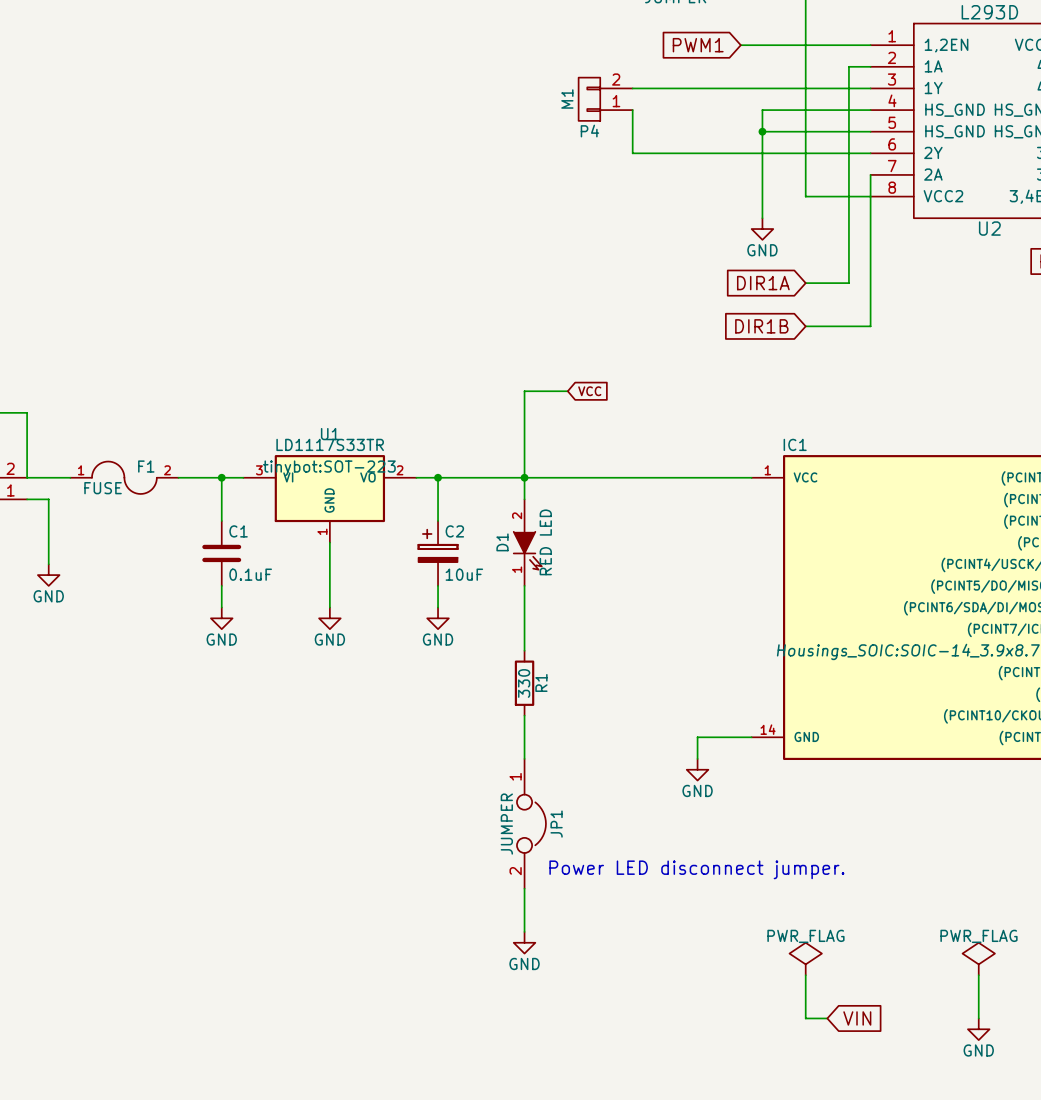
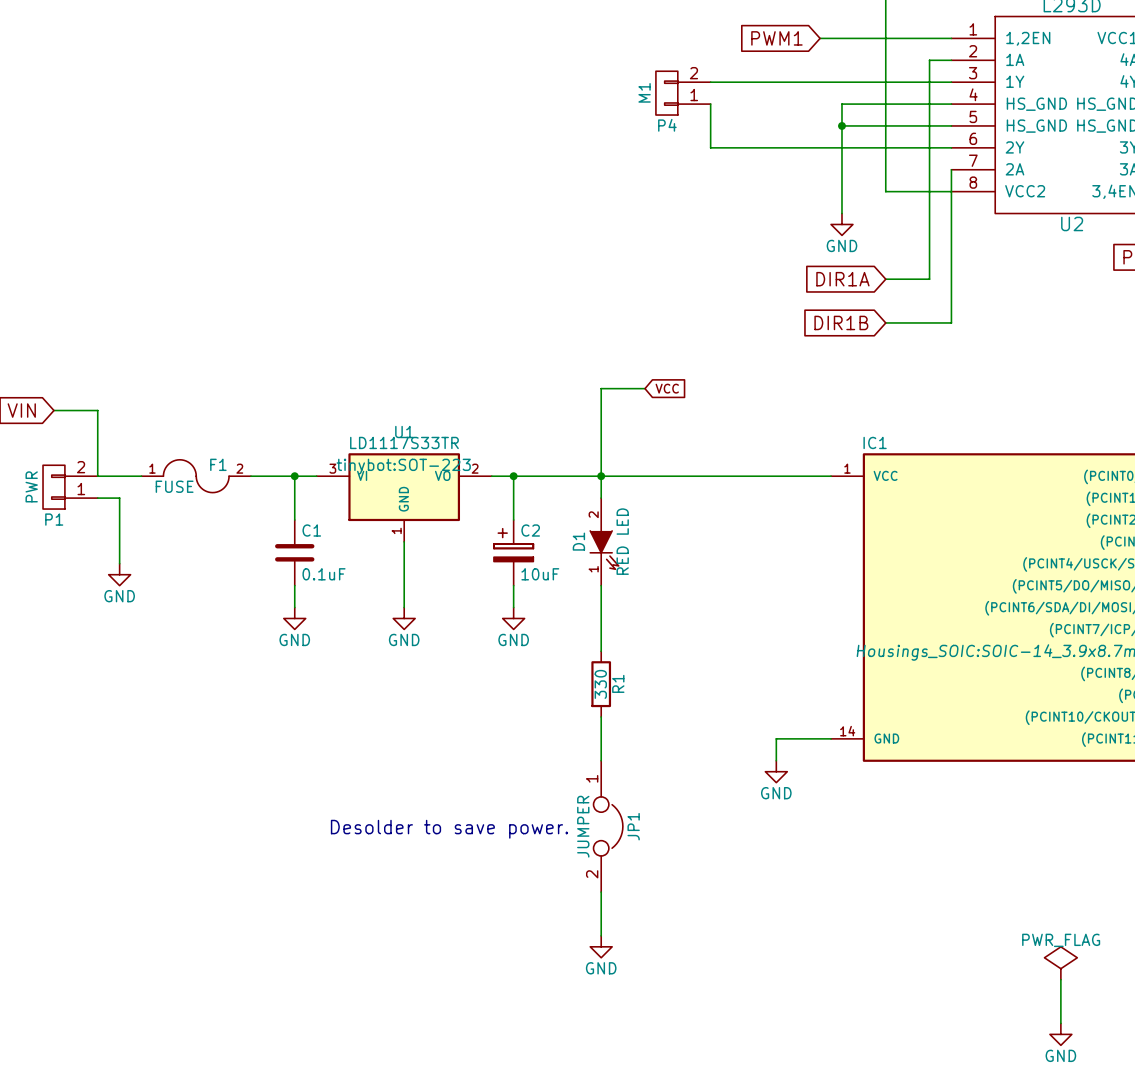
text: none -> Desolder to save power. (449, 829)
text: Power LED disconnect jumper. (696, 869) -> none
power symbol: PWR_FLAG (805, 958) -> none
wire: (805, 975) (805, 1018) (827, 1018) -> none
global label: VIN (857, 1018) -> none

